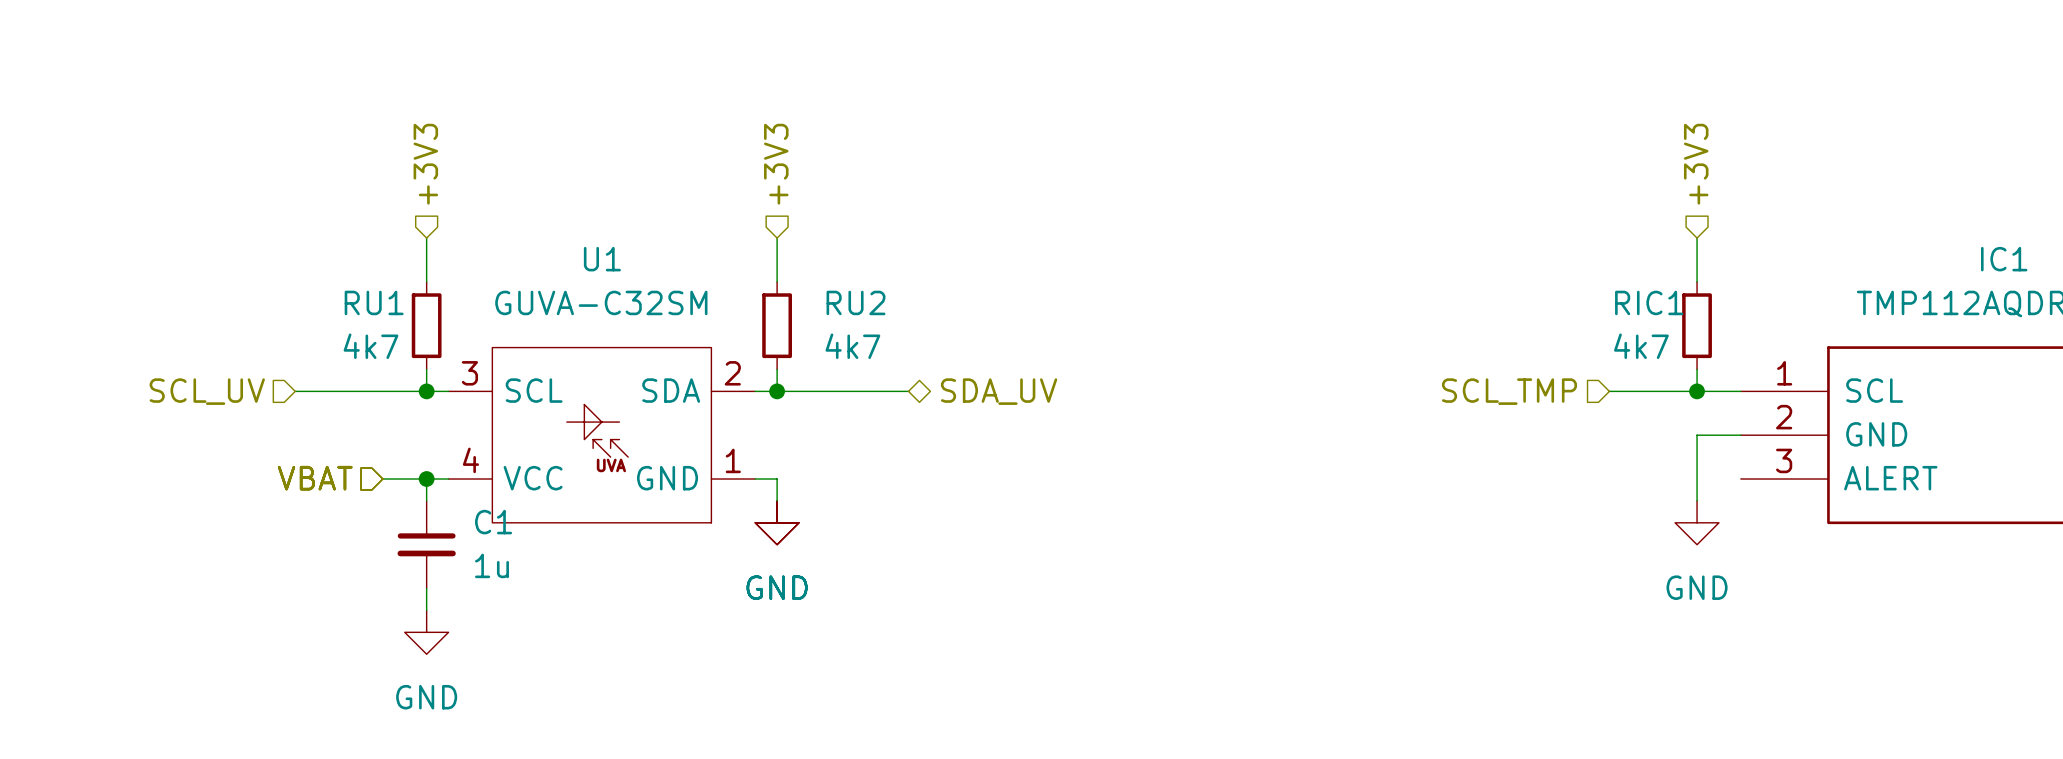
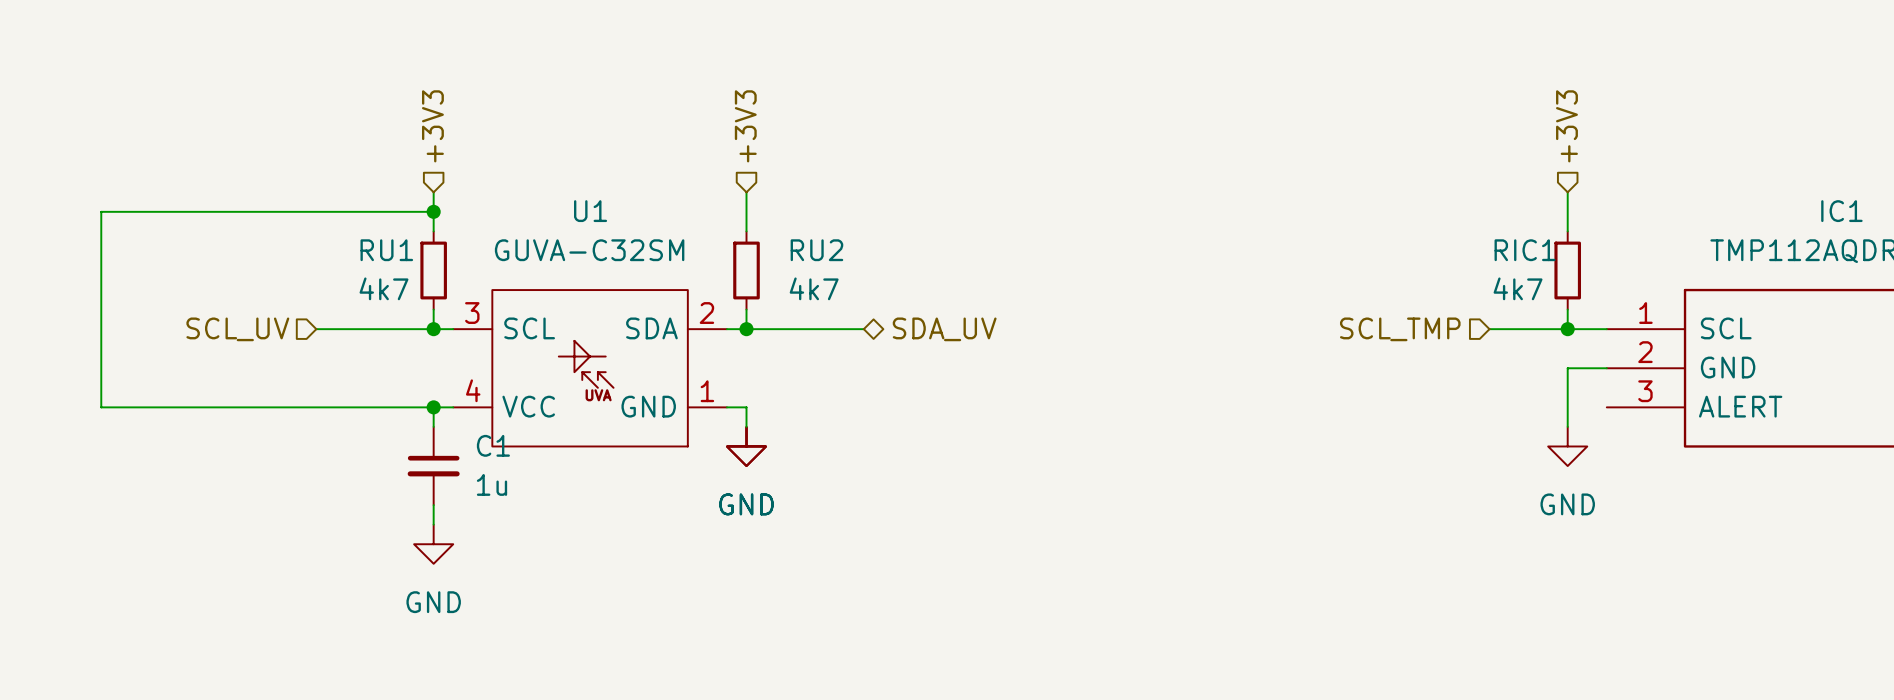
wire: none -> (433, 211) (101, 211) (101, 407) (394, 407)
junction: none -> (433, 211)
hierarchical label: VBAT (315, 478) -> none

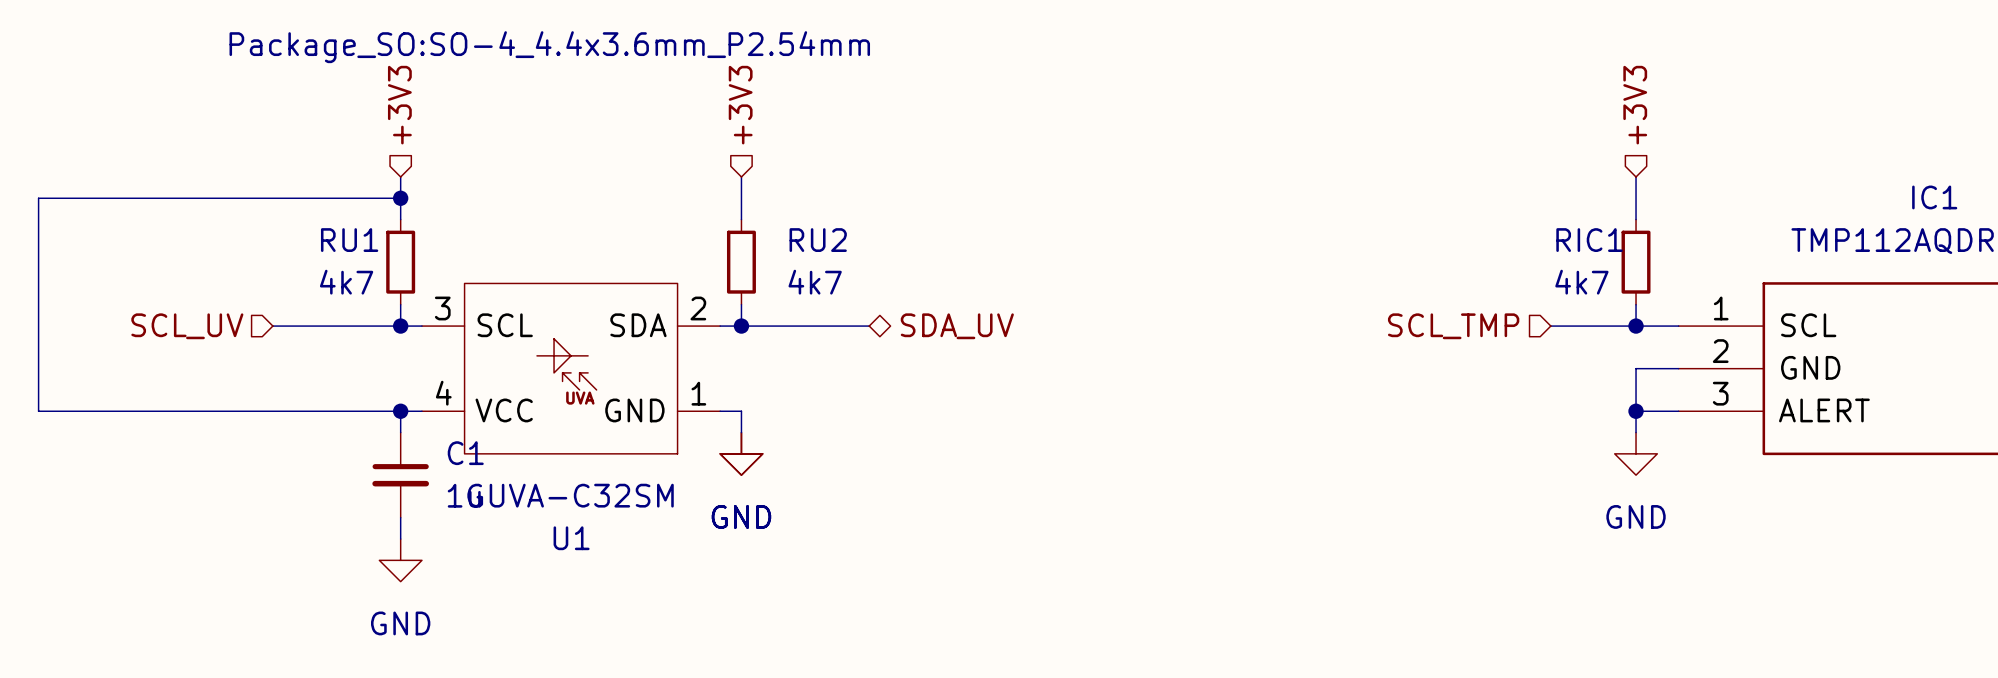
U1 text: none -> Package_SO:SO-4_4.4x3.6mm_P2.54mm (549, 47)
U1 name position: U1 (590, 211) -> U1 (571, 538)
U1 value position: GUVA-C32SM (589, 250) -> GUVA-C32SM (570, 495)
wire: none -> (1636, 411) (1678, 411)
junction: none -> (1636, 411)

